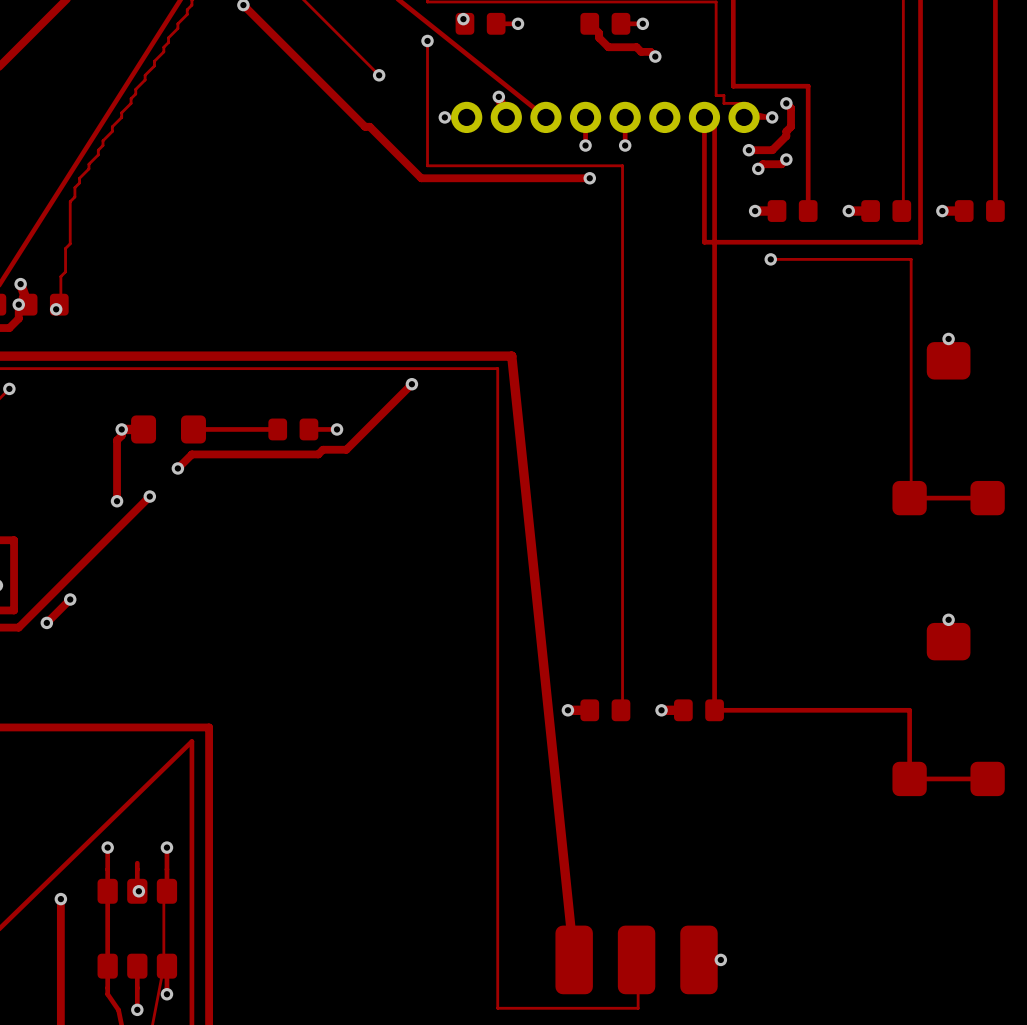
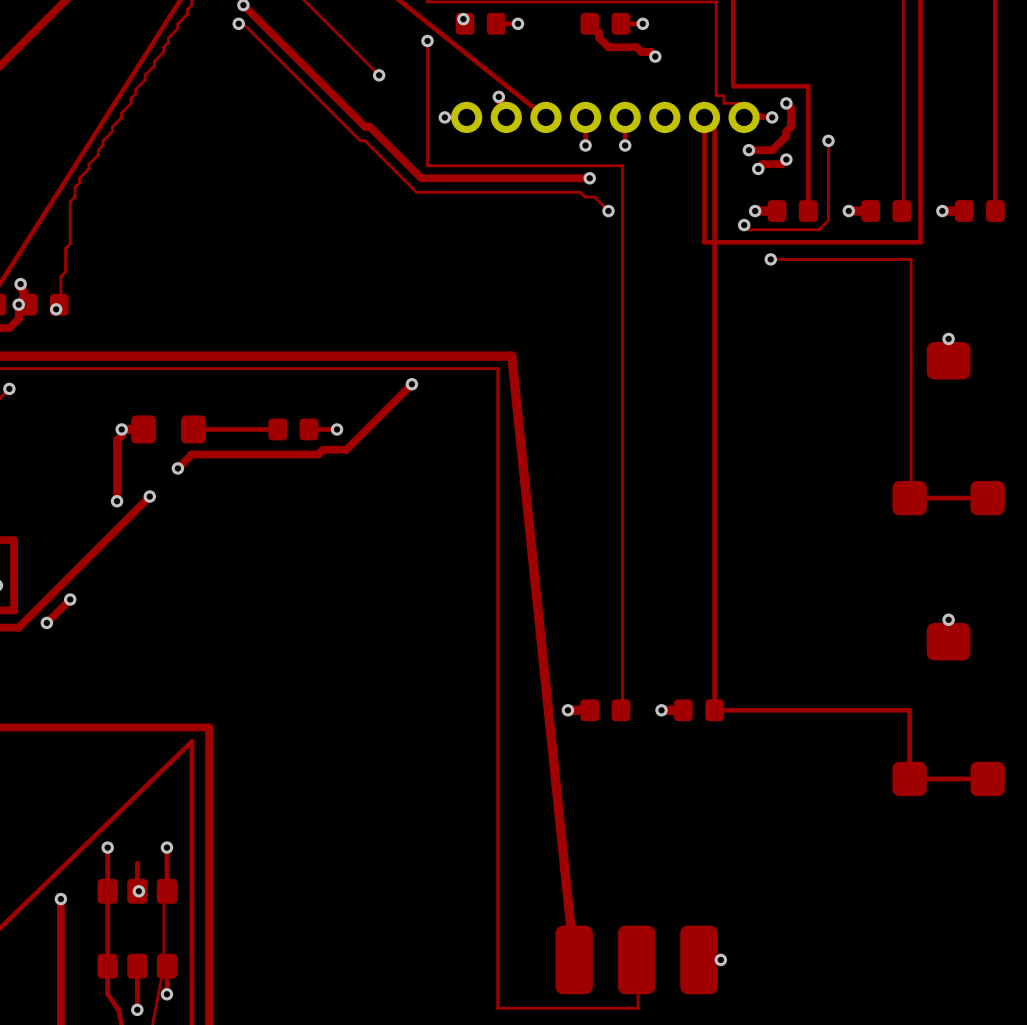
track: none -> (238, 23) (243, 23) (360, 140) (365, 140) (416, 192) (580, 192) (585, 196) (594, 196) (608, 211)
via: none -> (238, 23)
track: none -> (828, 140) (828, 220) (819, 229) (748, 229) (744, 225)
via: none -> (828, 140)
via: none -> (608, 211)
via: none -> (744, 225)

